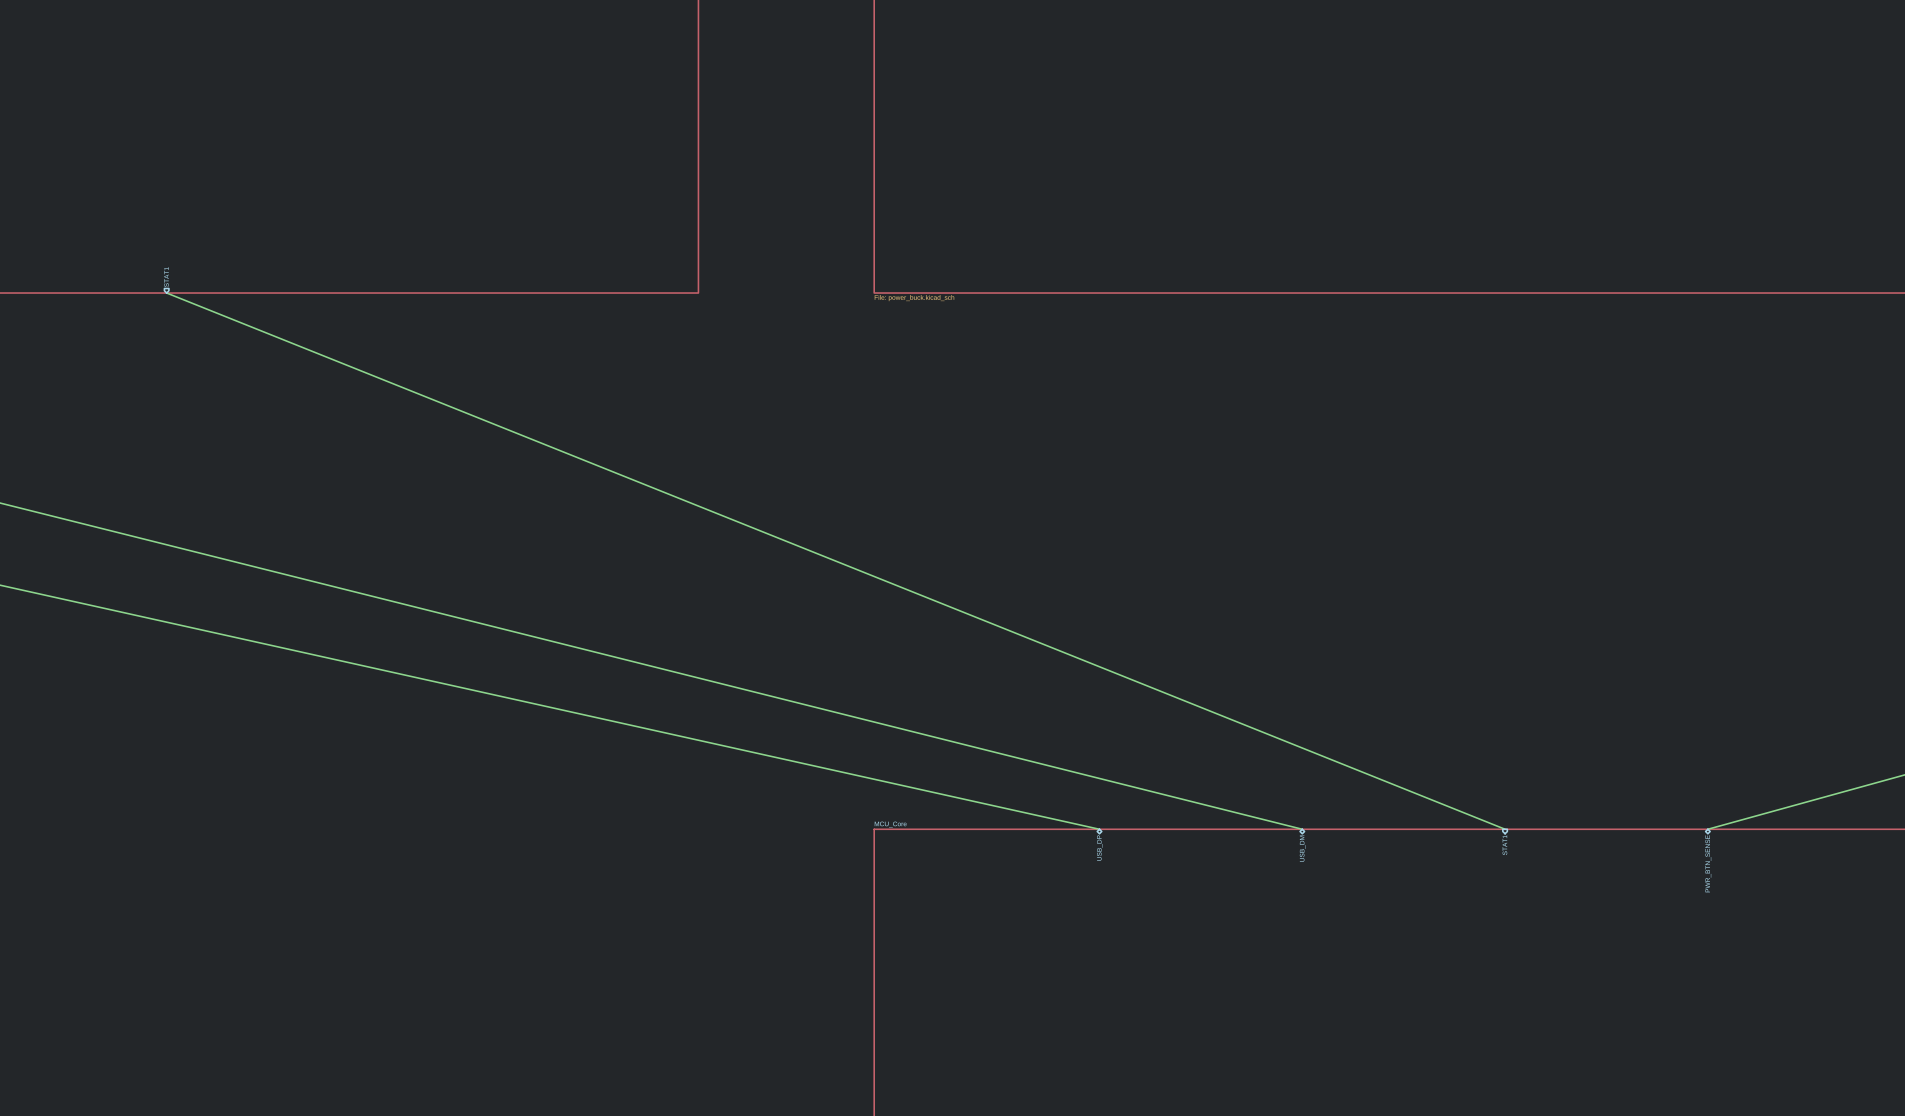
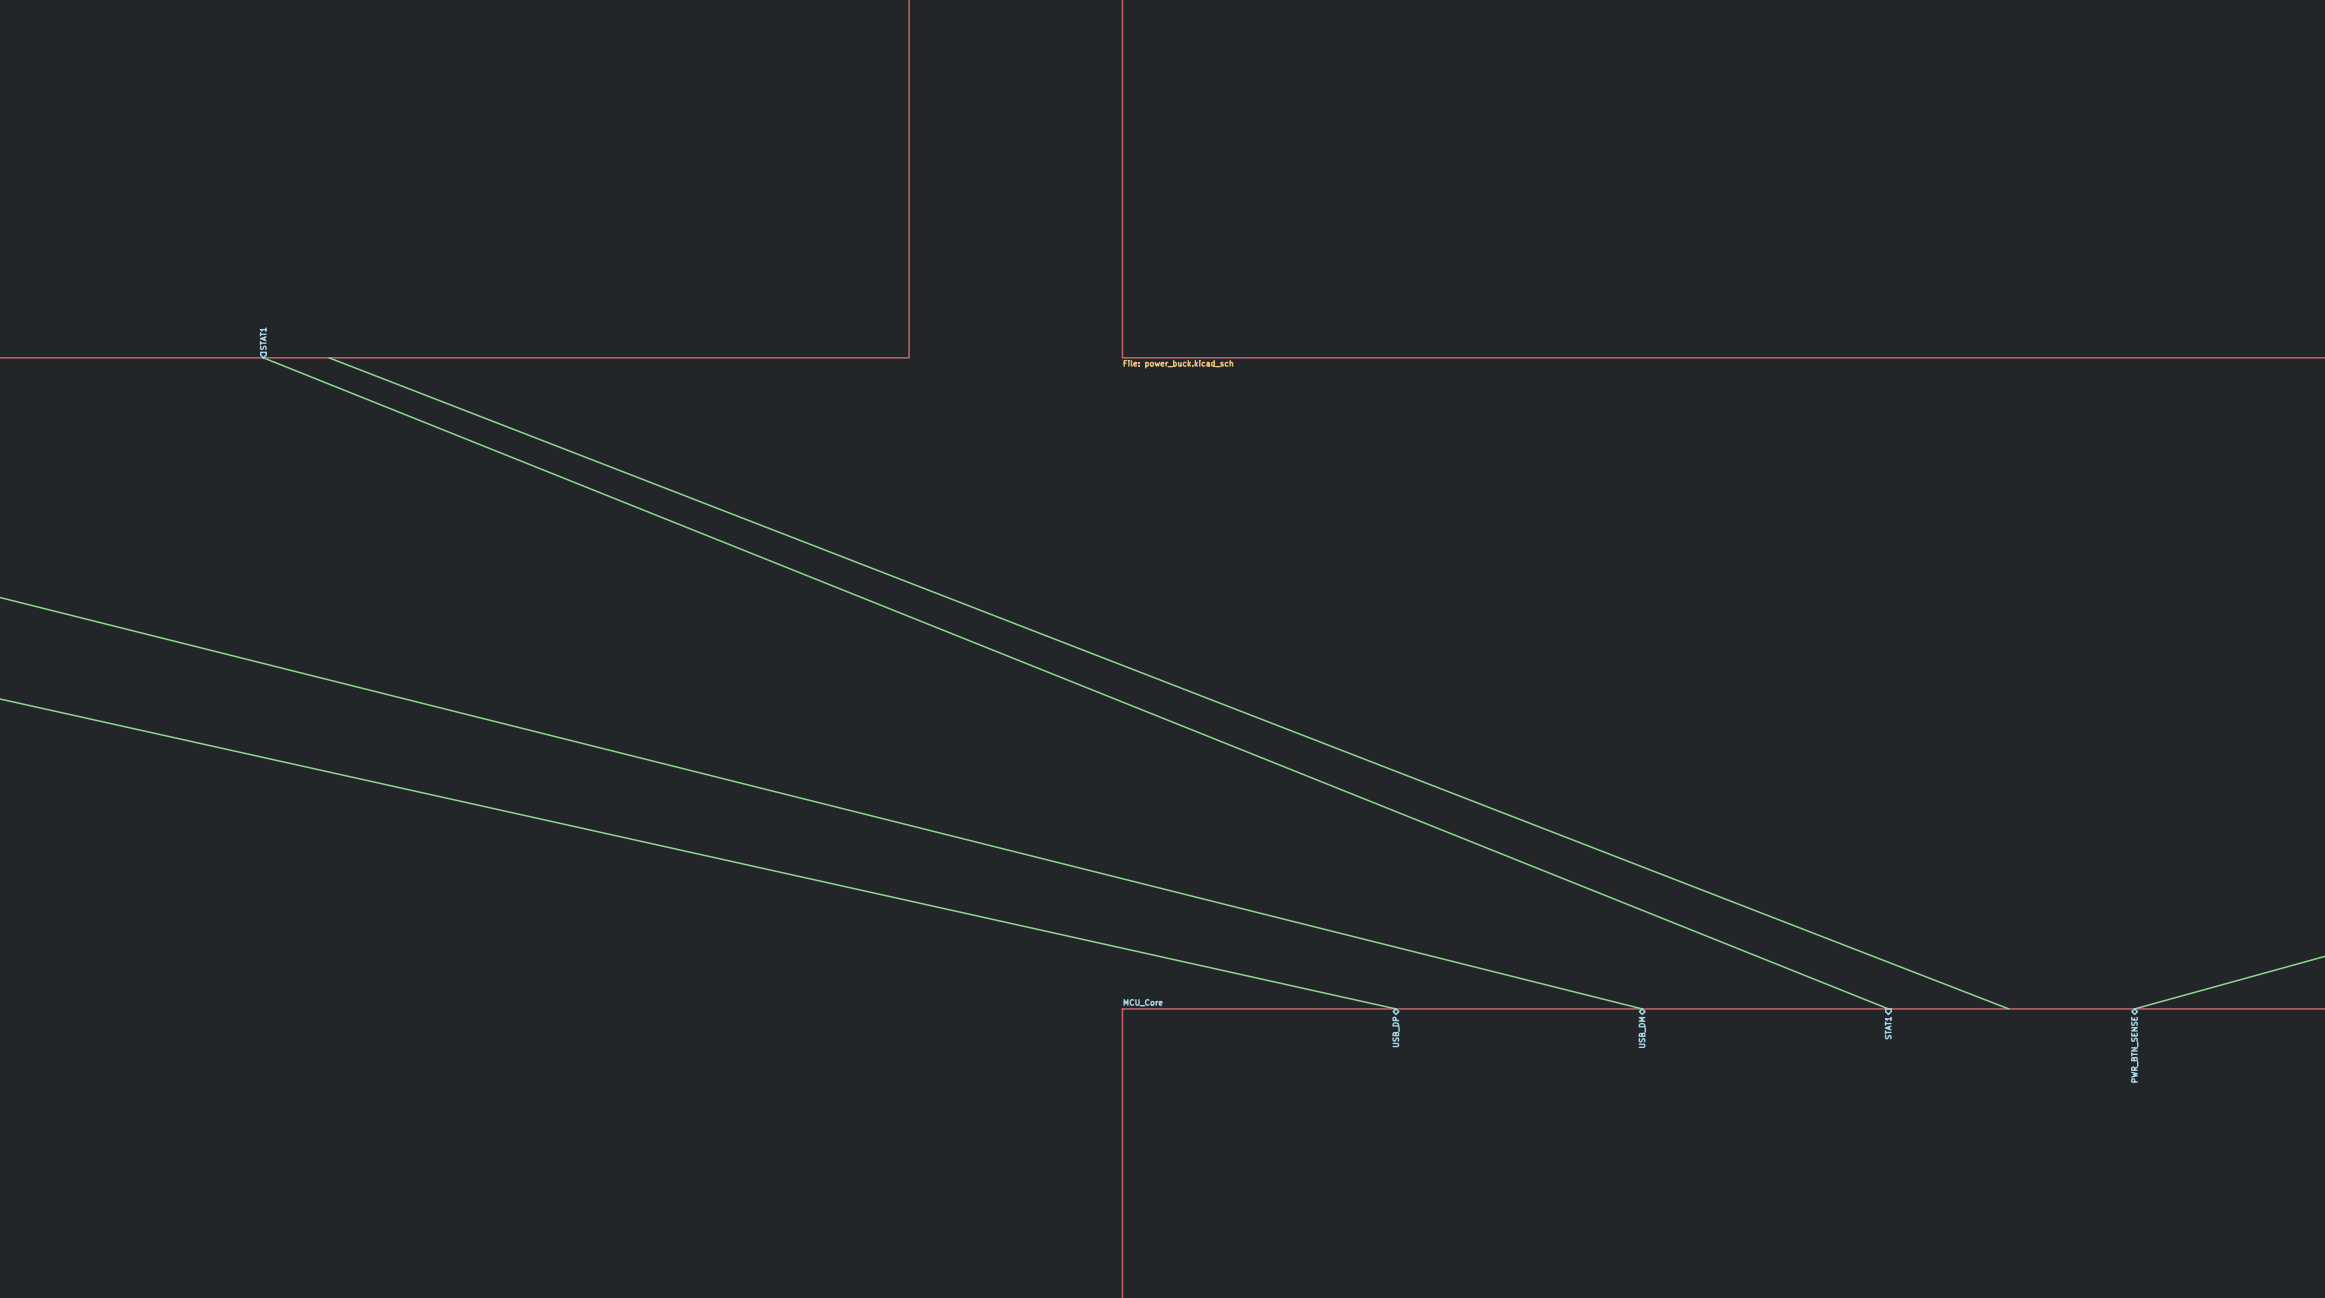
wire: none -> (329, 357) (2008, 1008)

